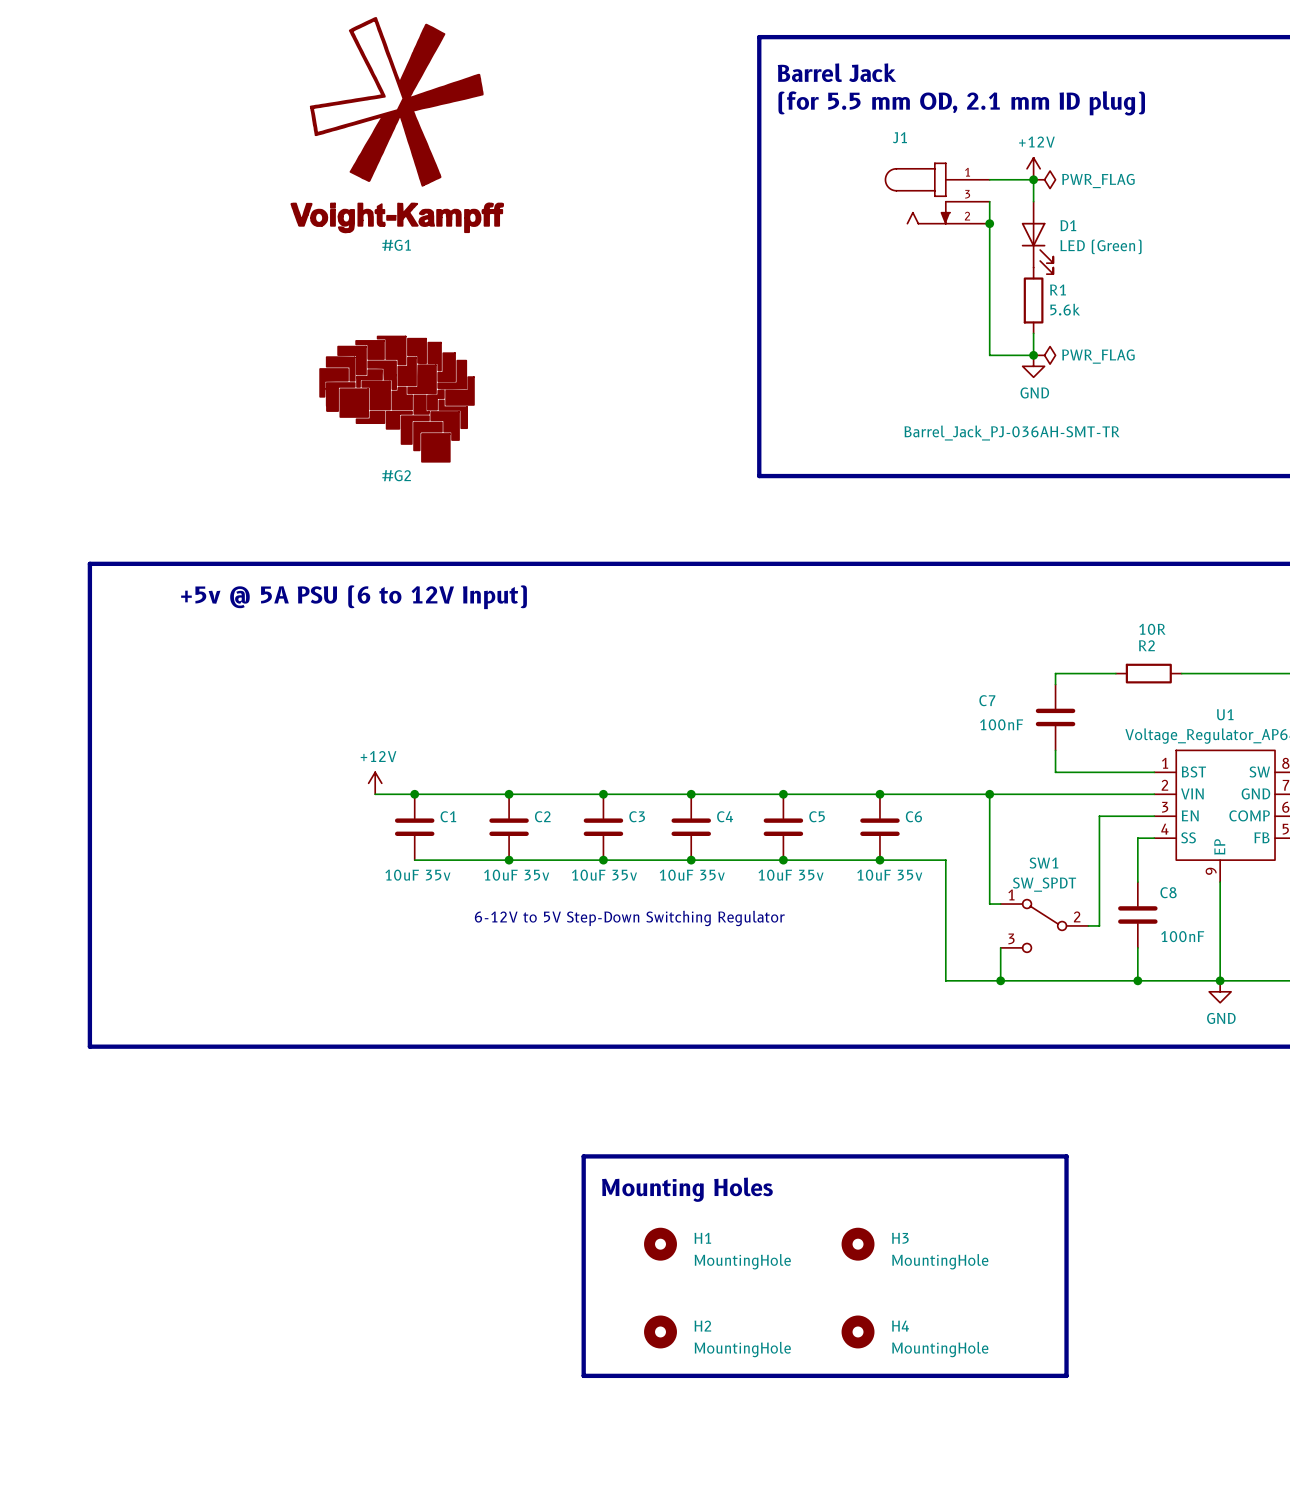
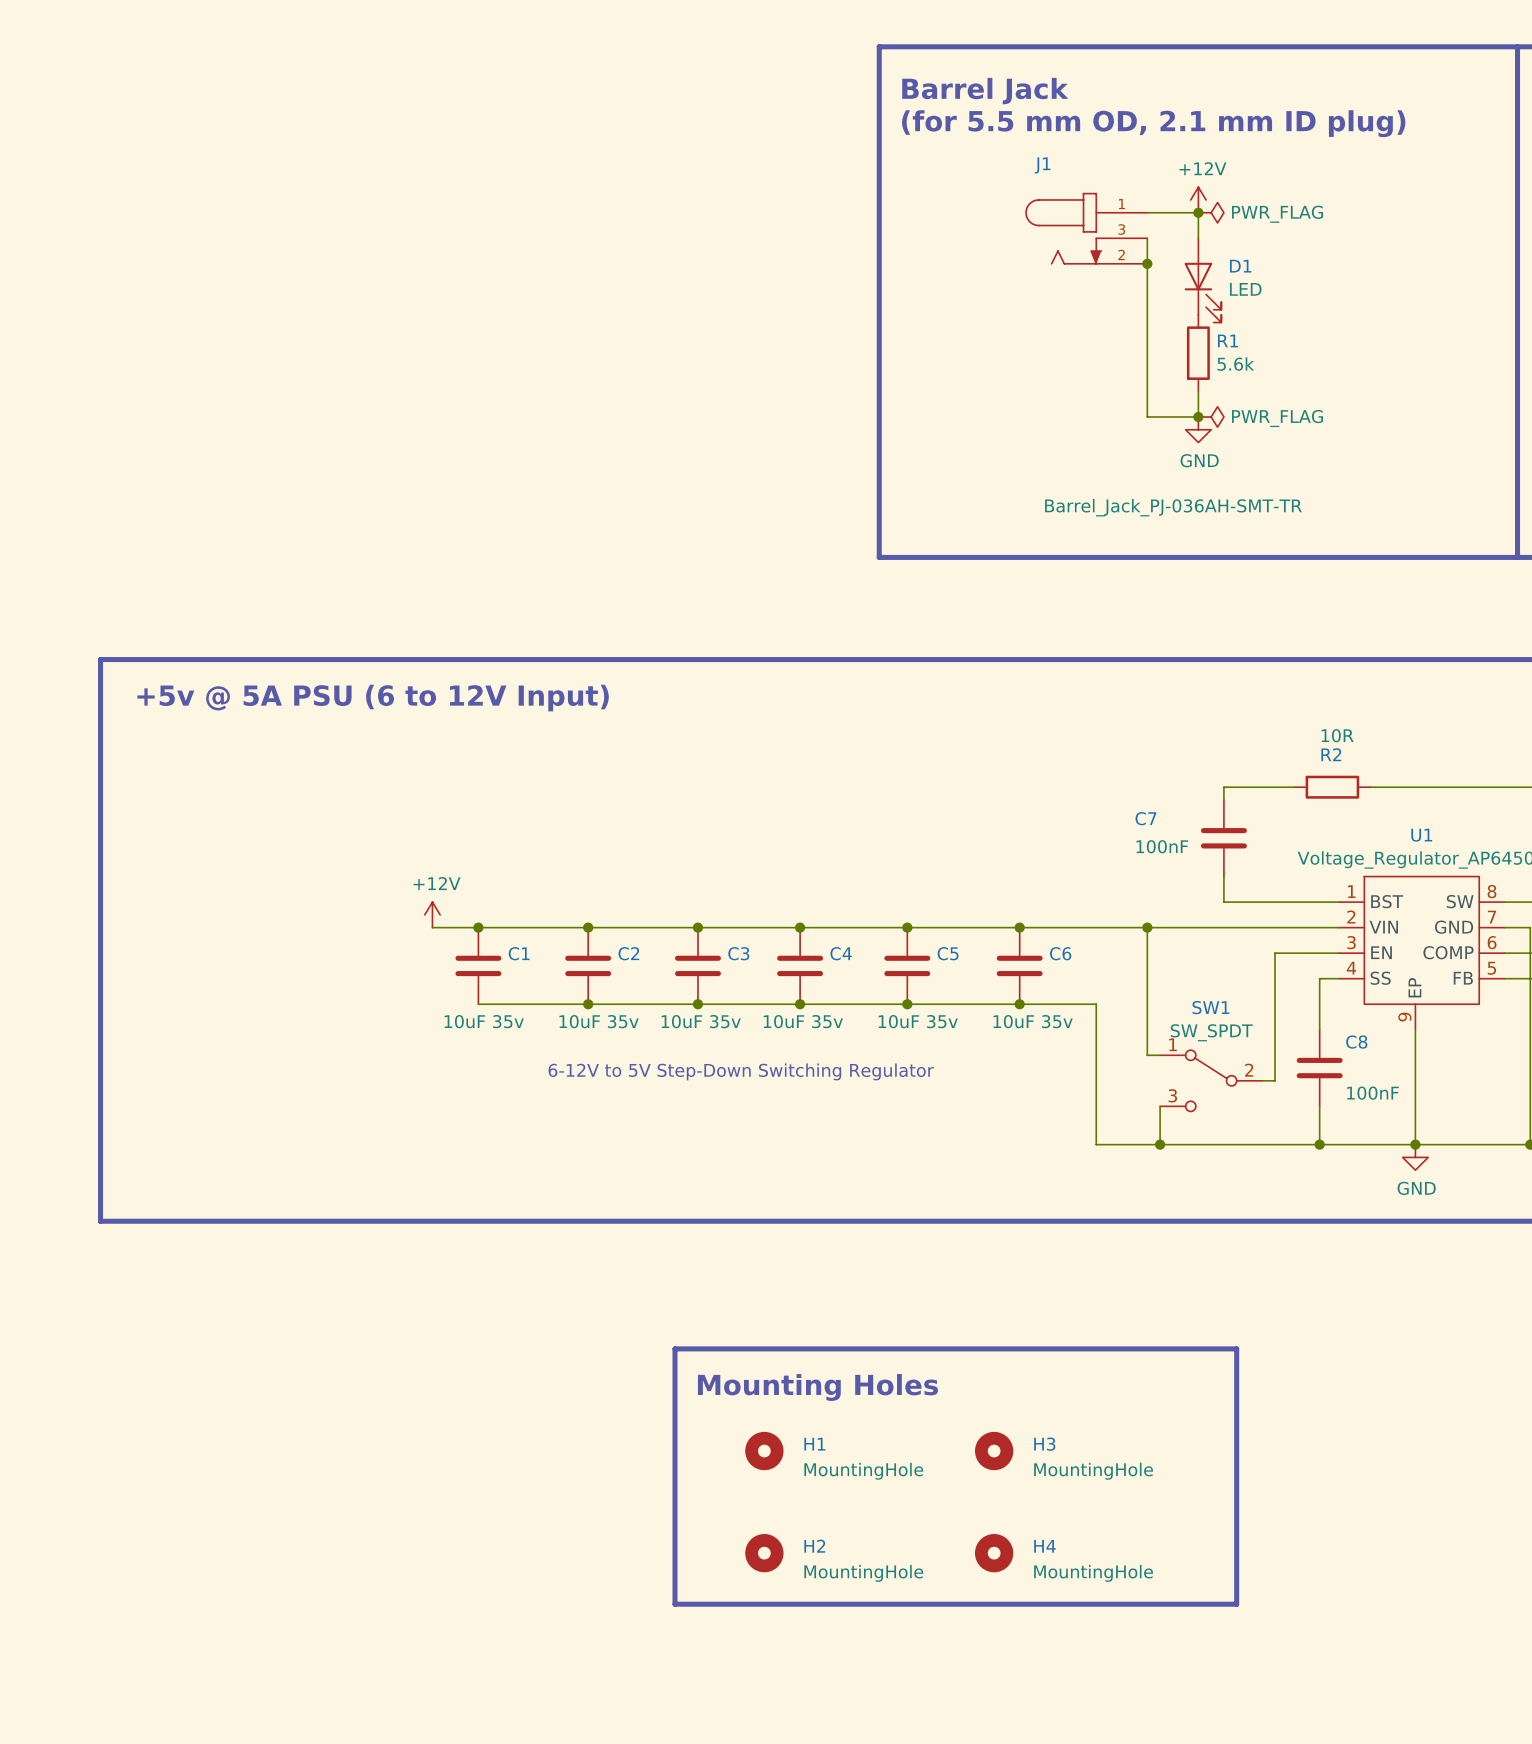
#G1: (397, 125) -> none
D1 value: LED (Green) (1101, 246) -> LED (1245, 289)
#G2: (397, 399) -> none

